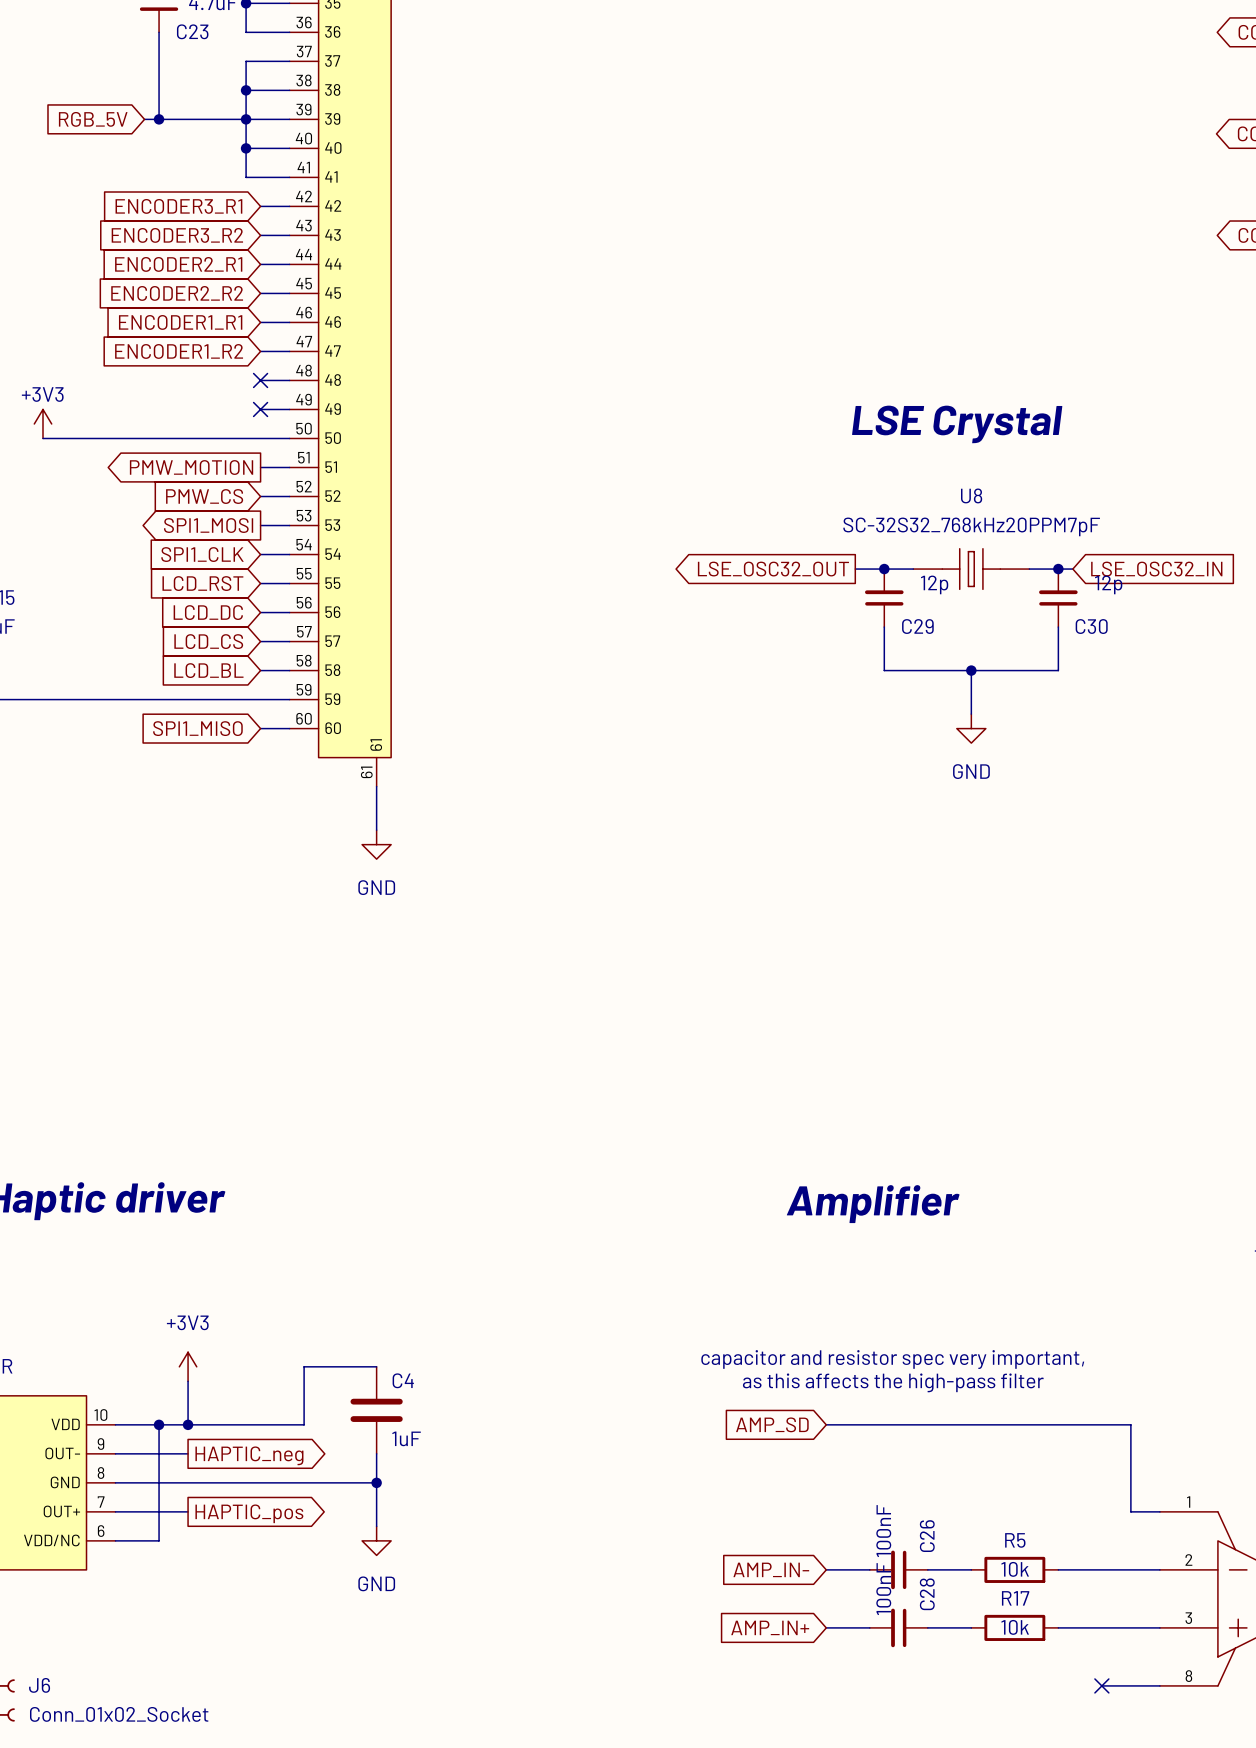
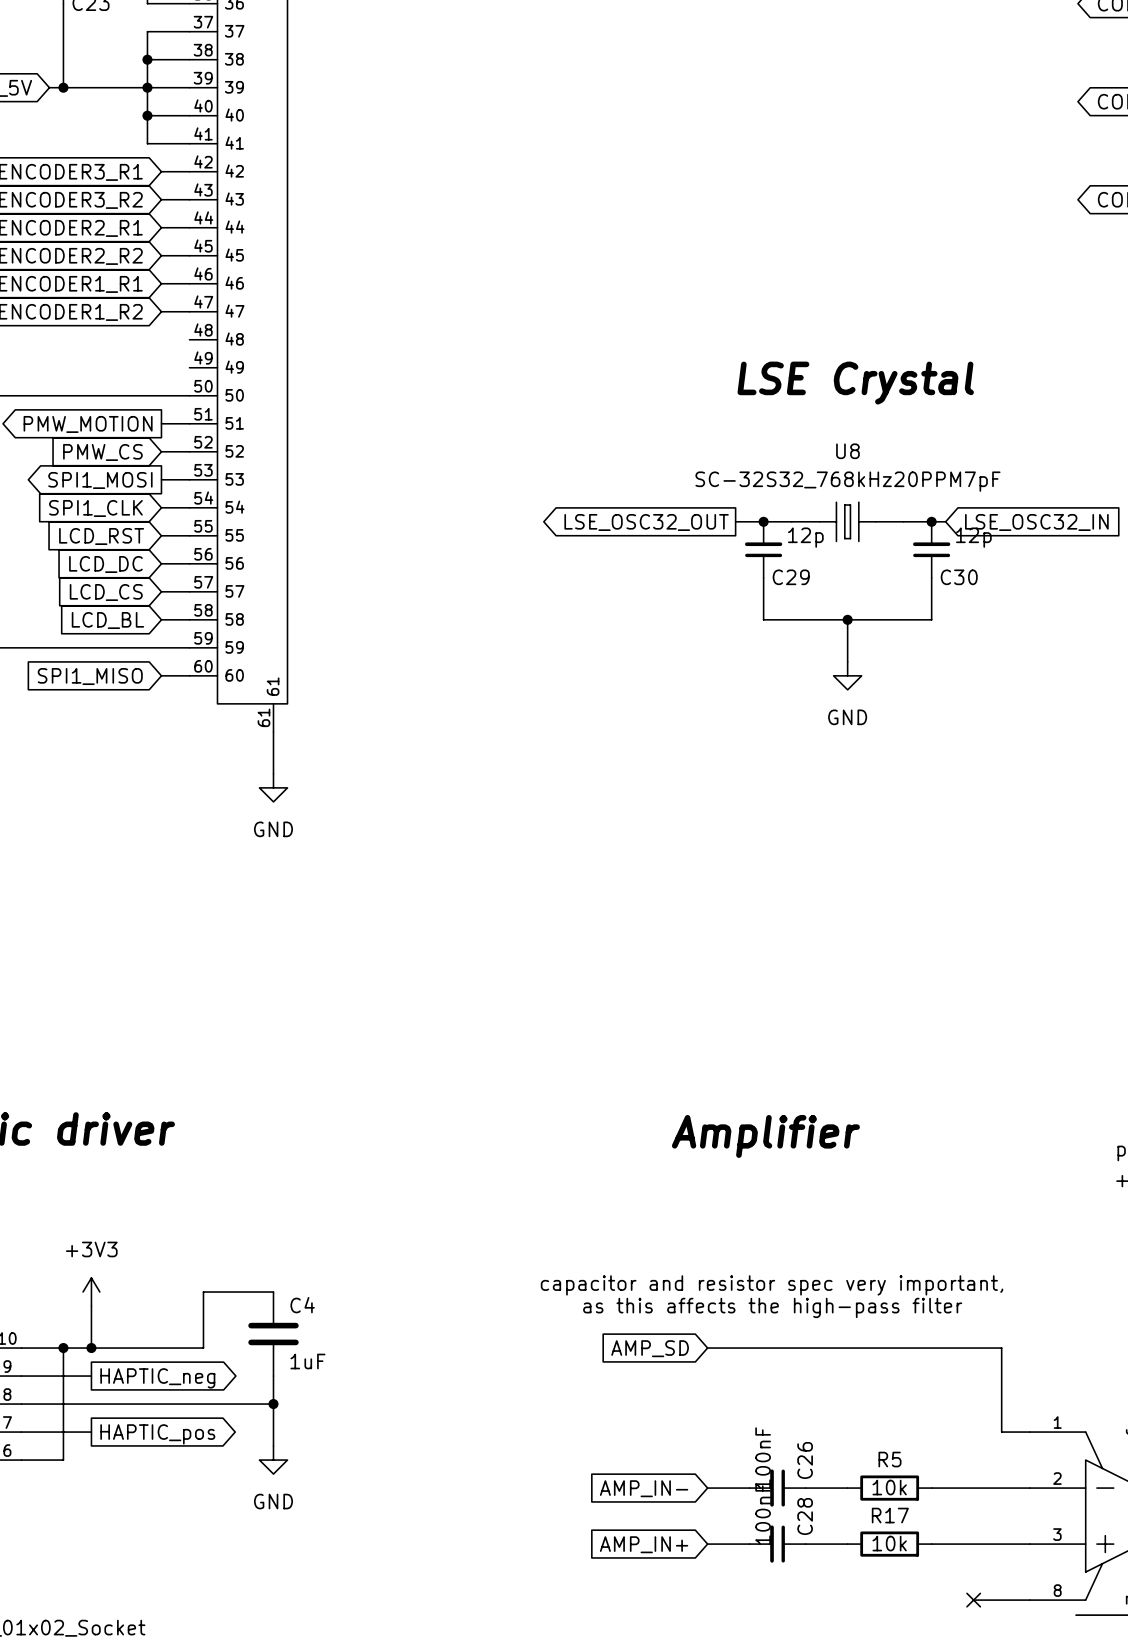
wire: (260, 380) (289, 380) -> none
no-connect mark: (260, 380) -> none
wire: (260, 409) (289, 409) -> none
no-connect mark: (260, 409) -> none

